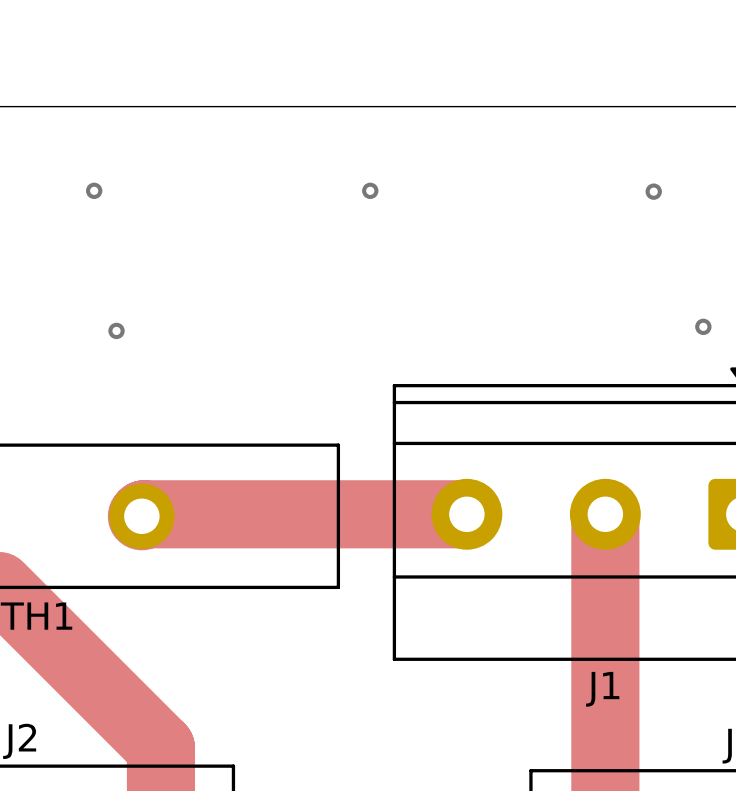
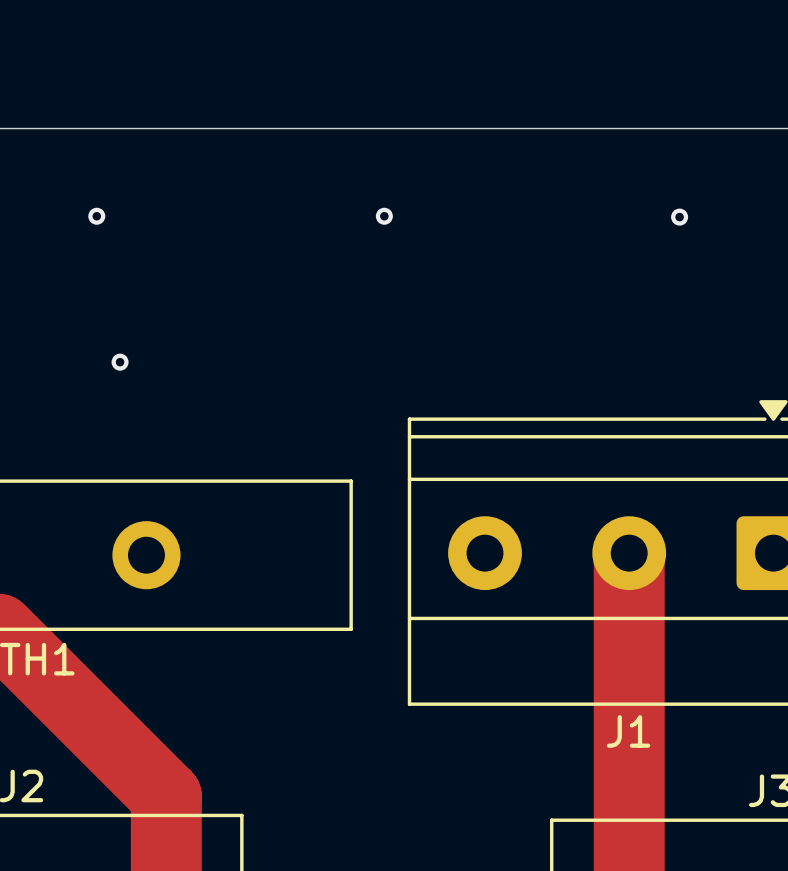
via: (703, 326) -> none
track: (466, 514) (143, 514) (141, 516) -> none

